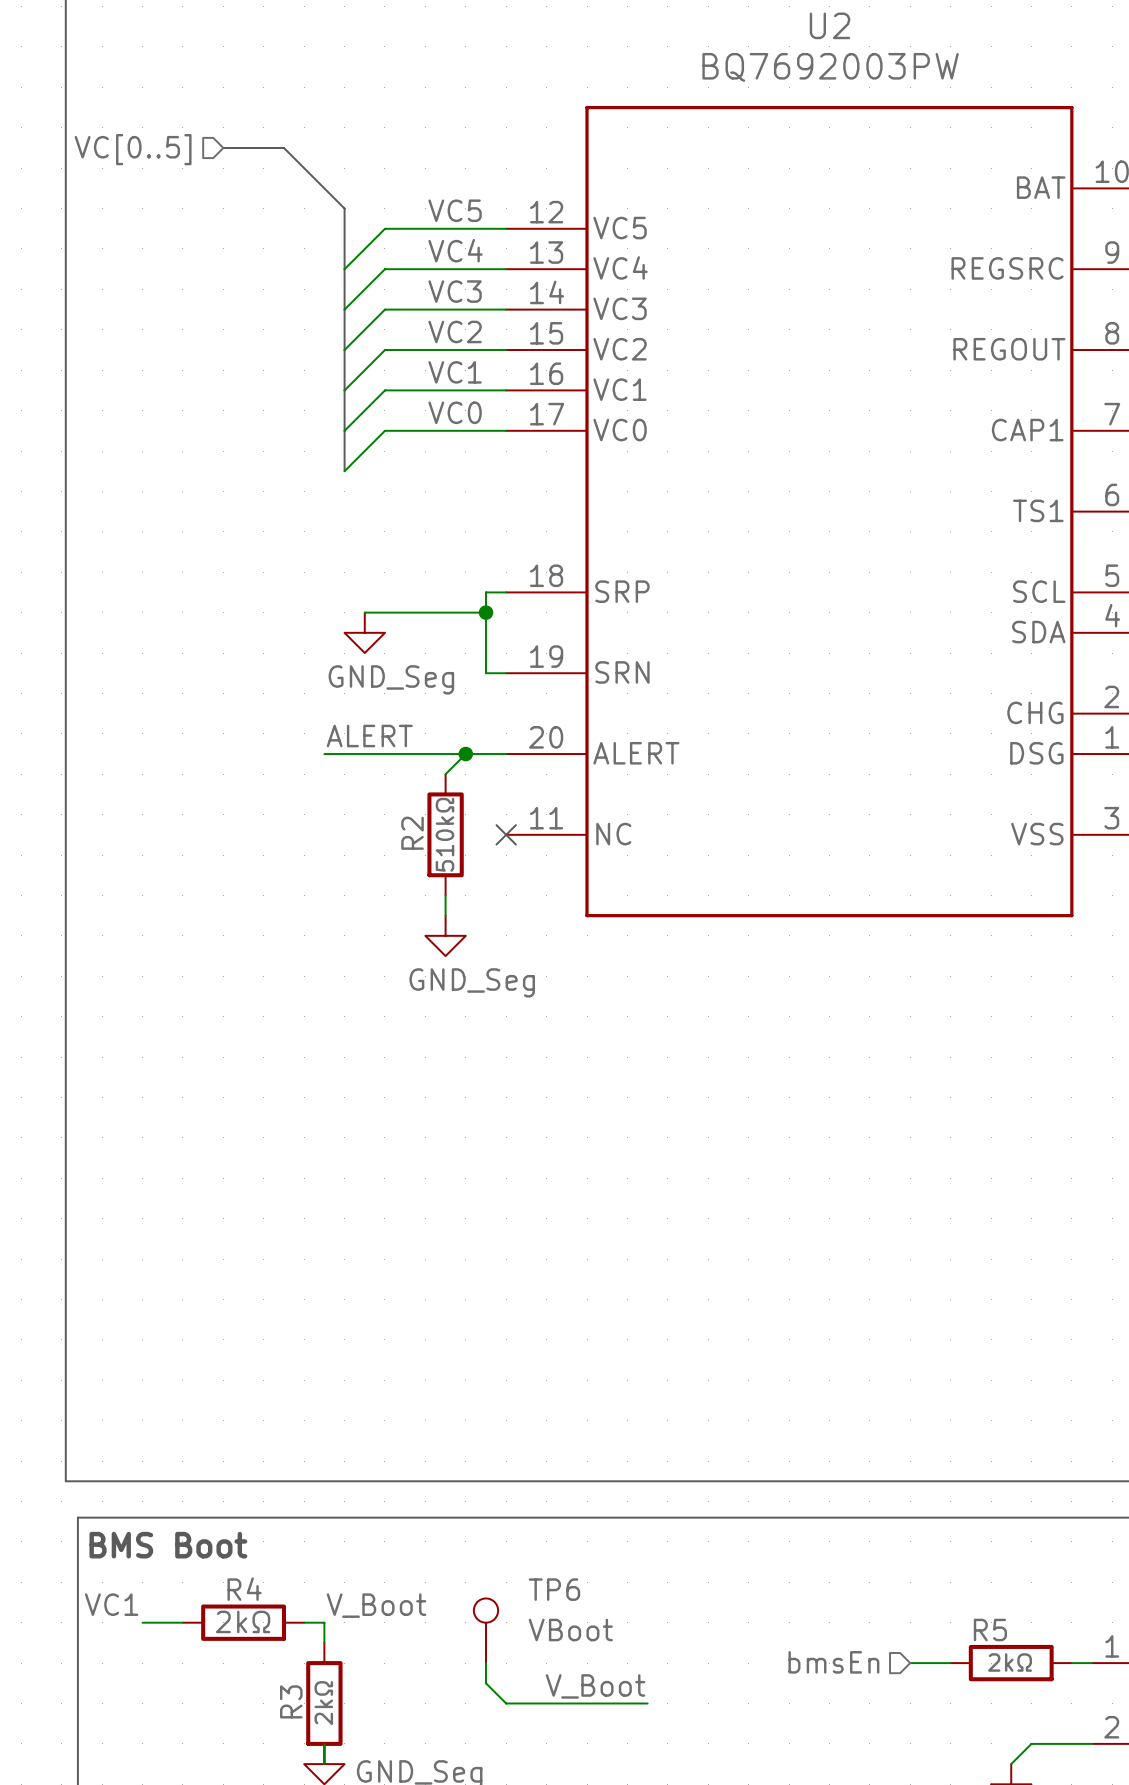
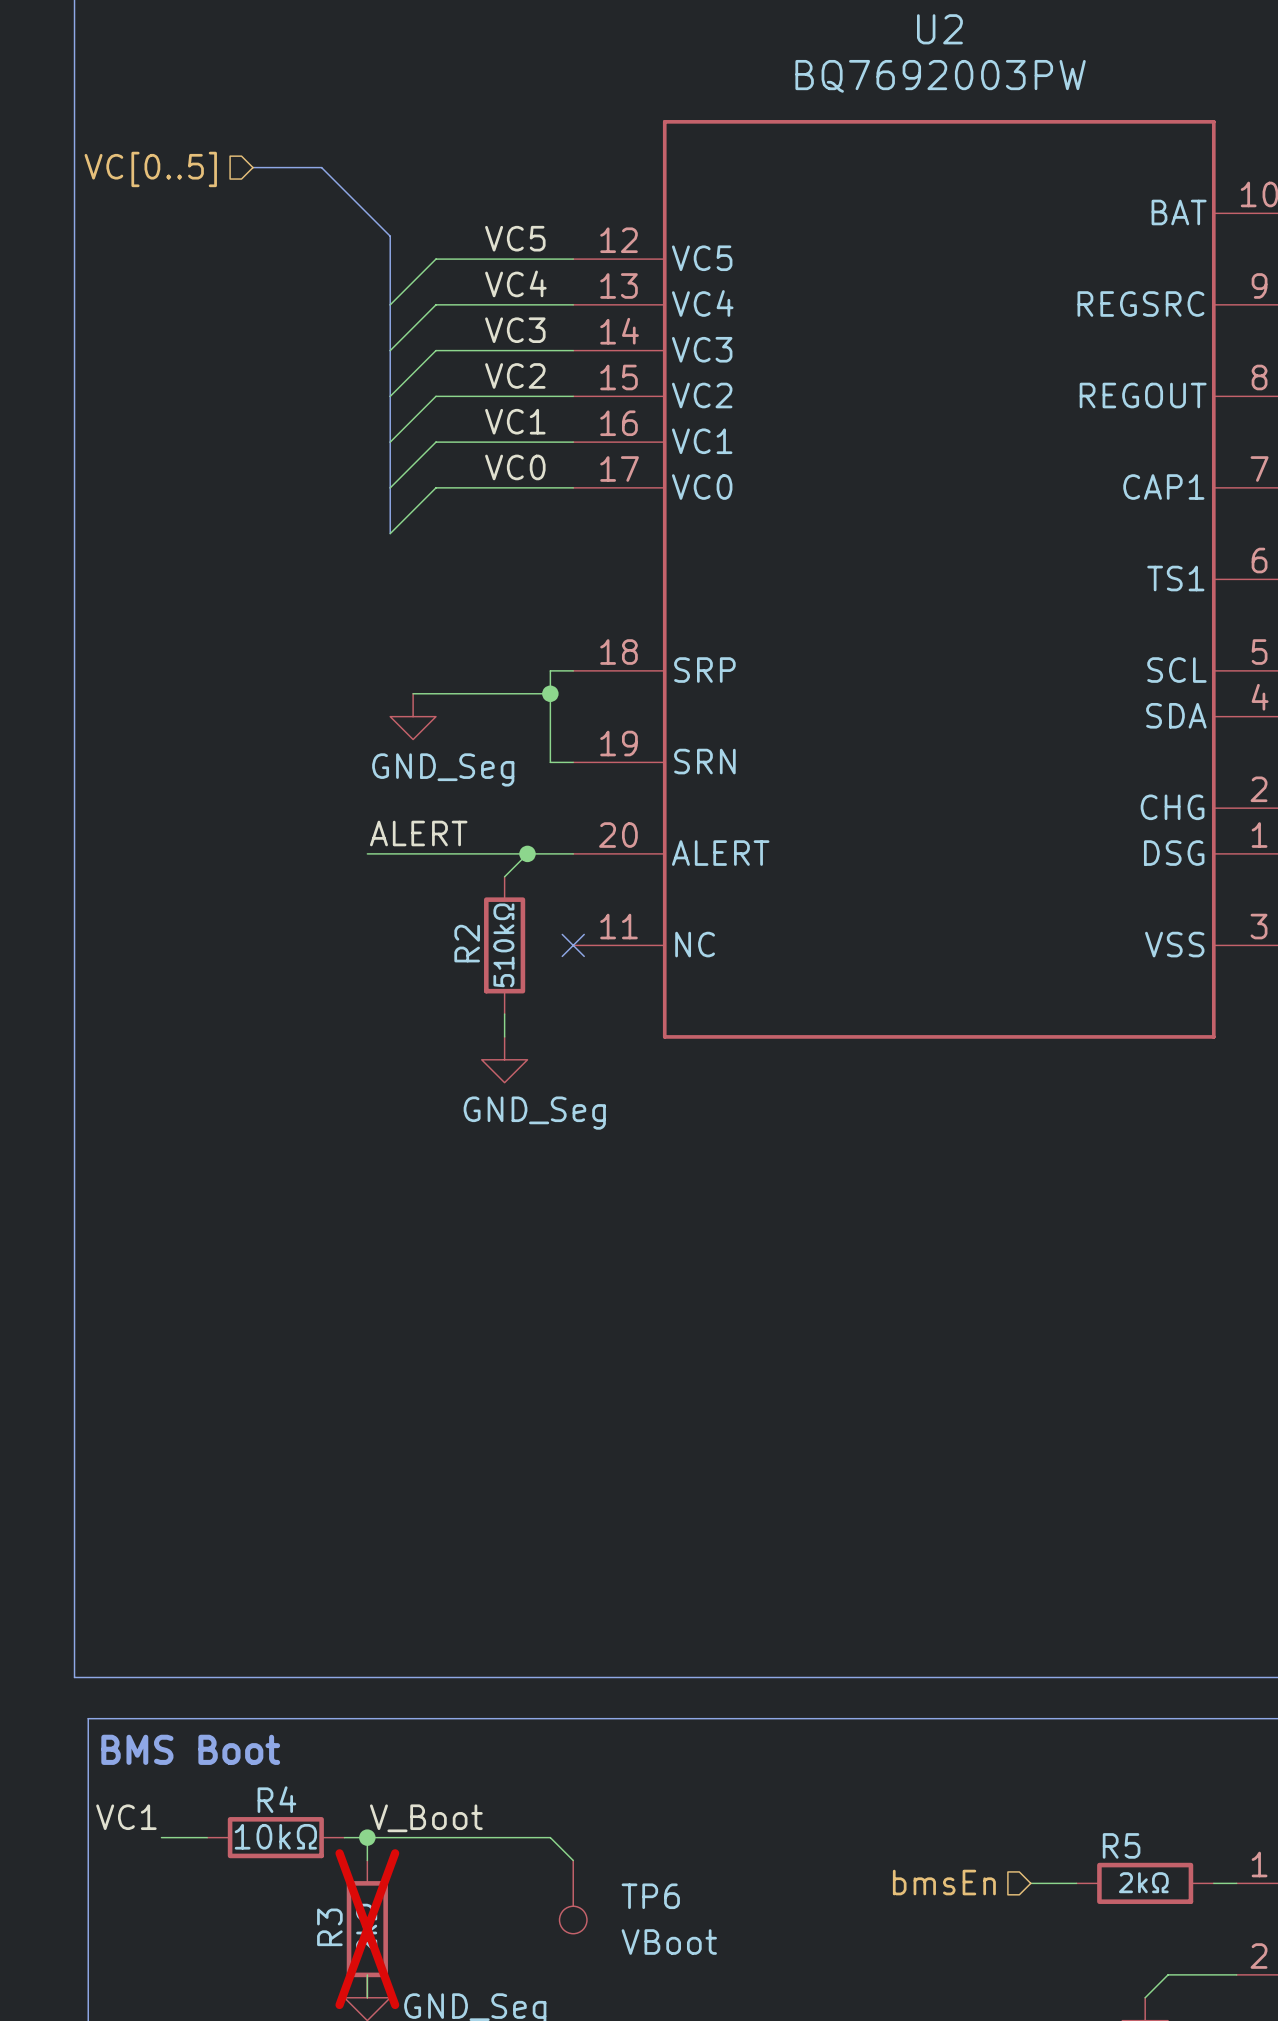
TP6 name position: TP6 (554, 1589) -> TP6 (650, 1896)
TP6 rotation: 0° (485, 1610) -> 180° (573, 1919)
R4 value: 2kΩ (243, 1621) -> 10kΩ (275, 1836)
wire: none -> (367, 1837) (550, 1837) (573, 1860)
junction: none -> (367, 1837)
TP6 position: (485, 1630) -> (573, 1897)
TP6 value position: VBoot (570, 1630) -> VBoot (669, 1942)
wire: (485, 1663) (485, 1683) (506, 1703) (647, 1703) -> none
label: V_Boot (595, 1686) -> none
R3 do-not-place cross: none -> (367, 1929)

